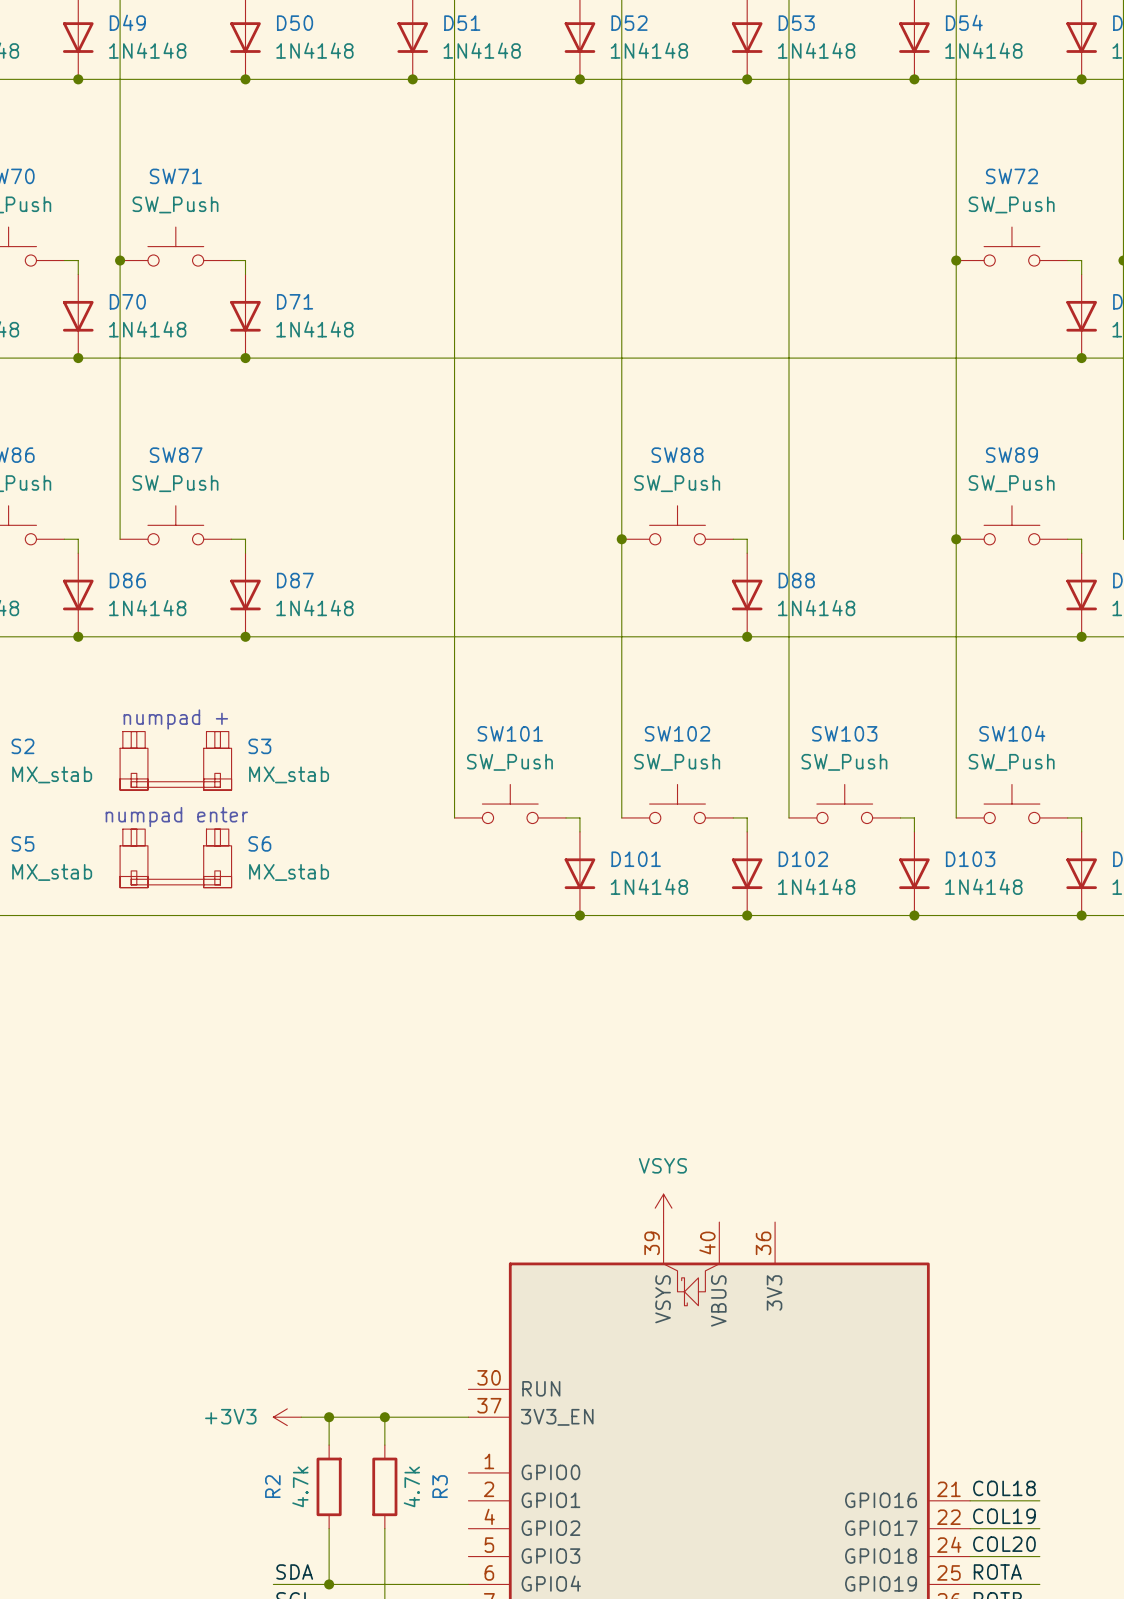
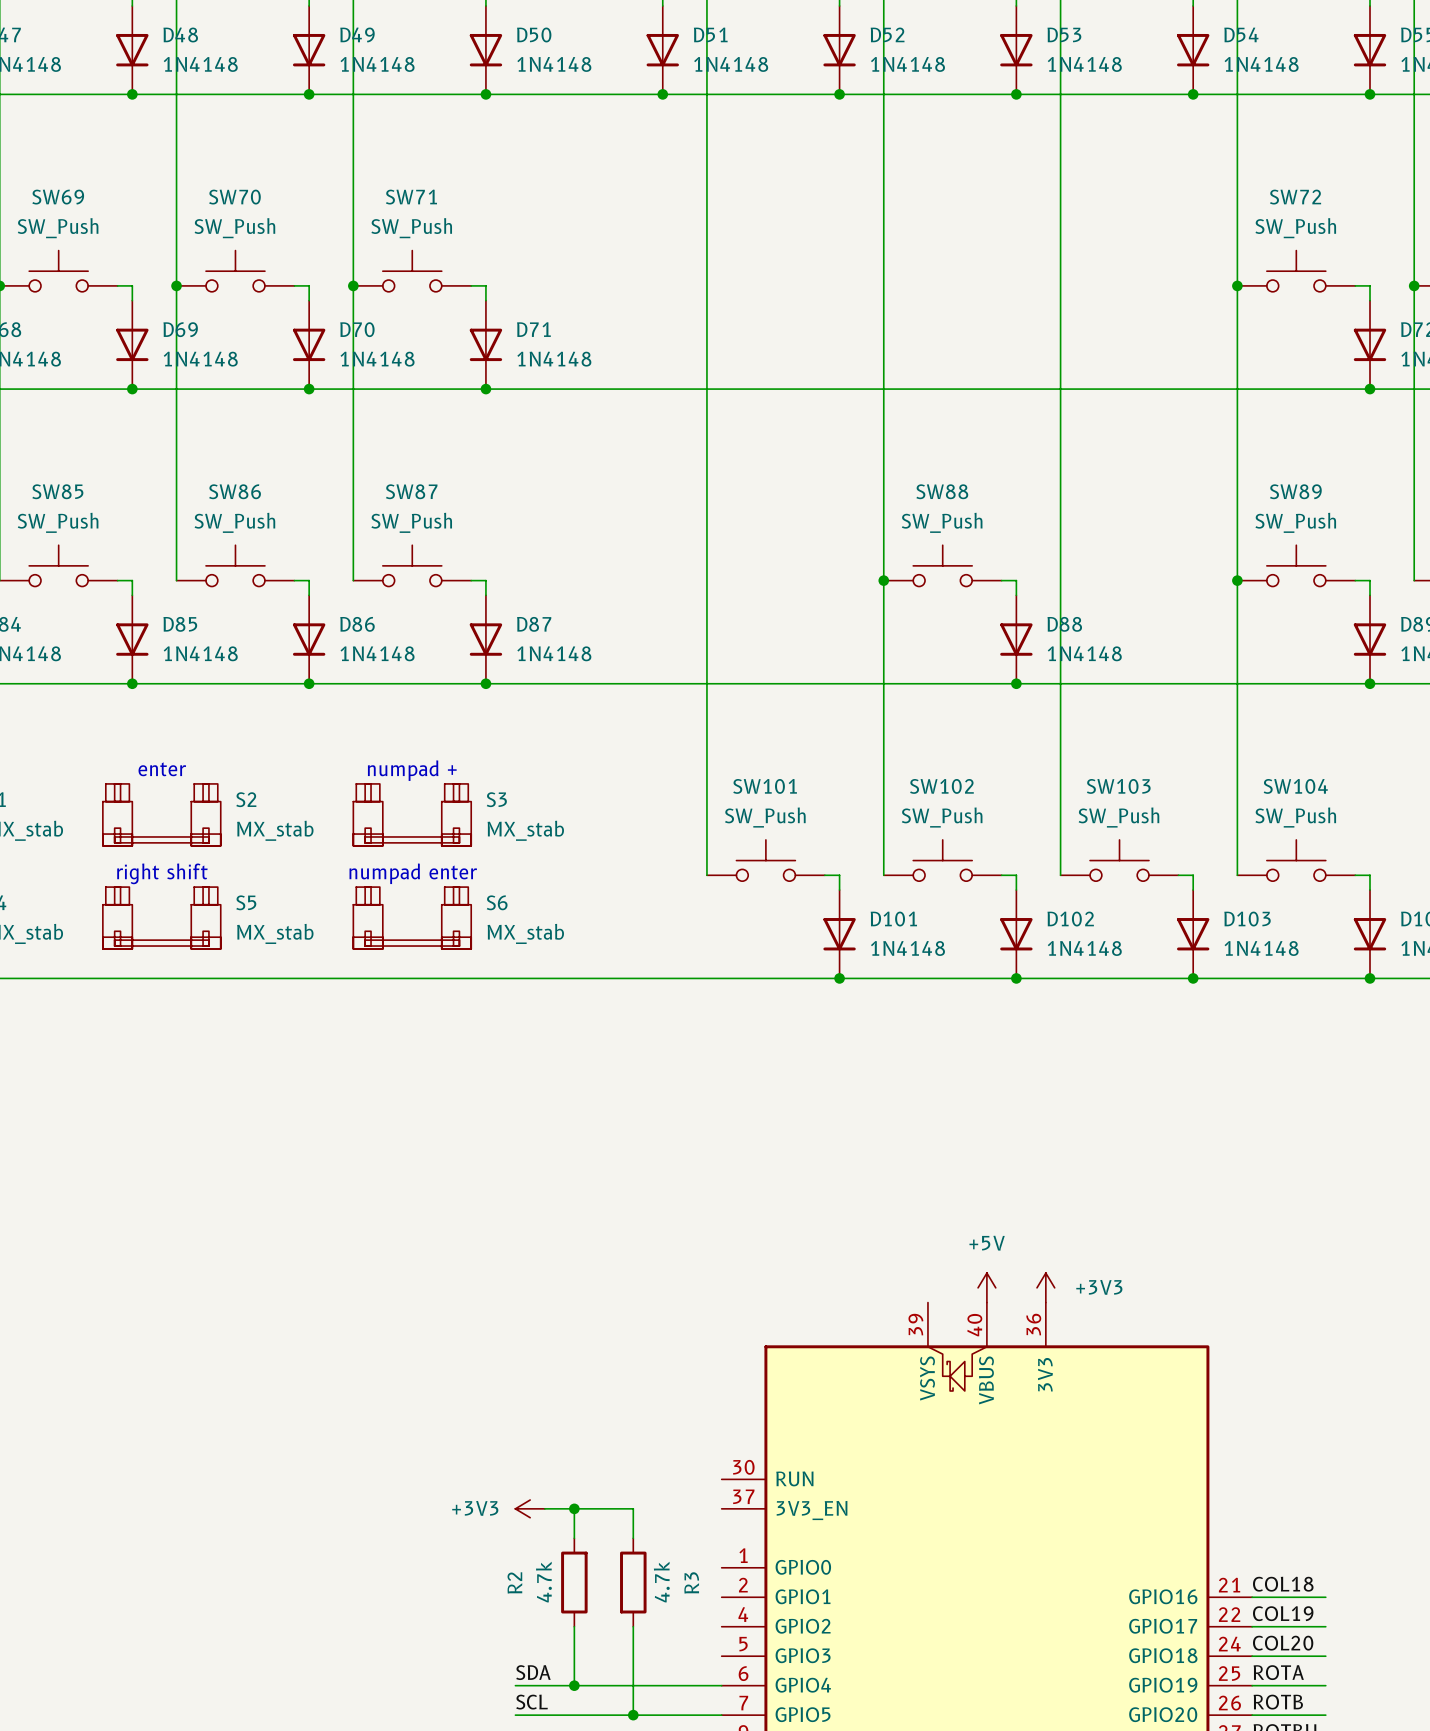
power symbol: VSYS (663, 1208) -> none
power symbol: none -> +5V (986, 1287)
power symbol: none -> +3V3 (1045, 1287)
wire: (384, 1417) (468, 1417) -> none
junction: (384, 1417) -> none

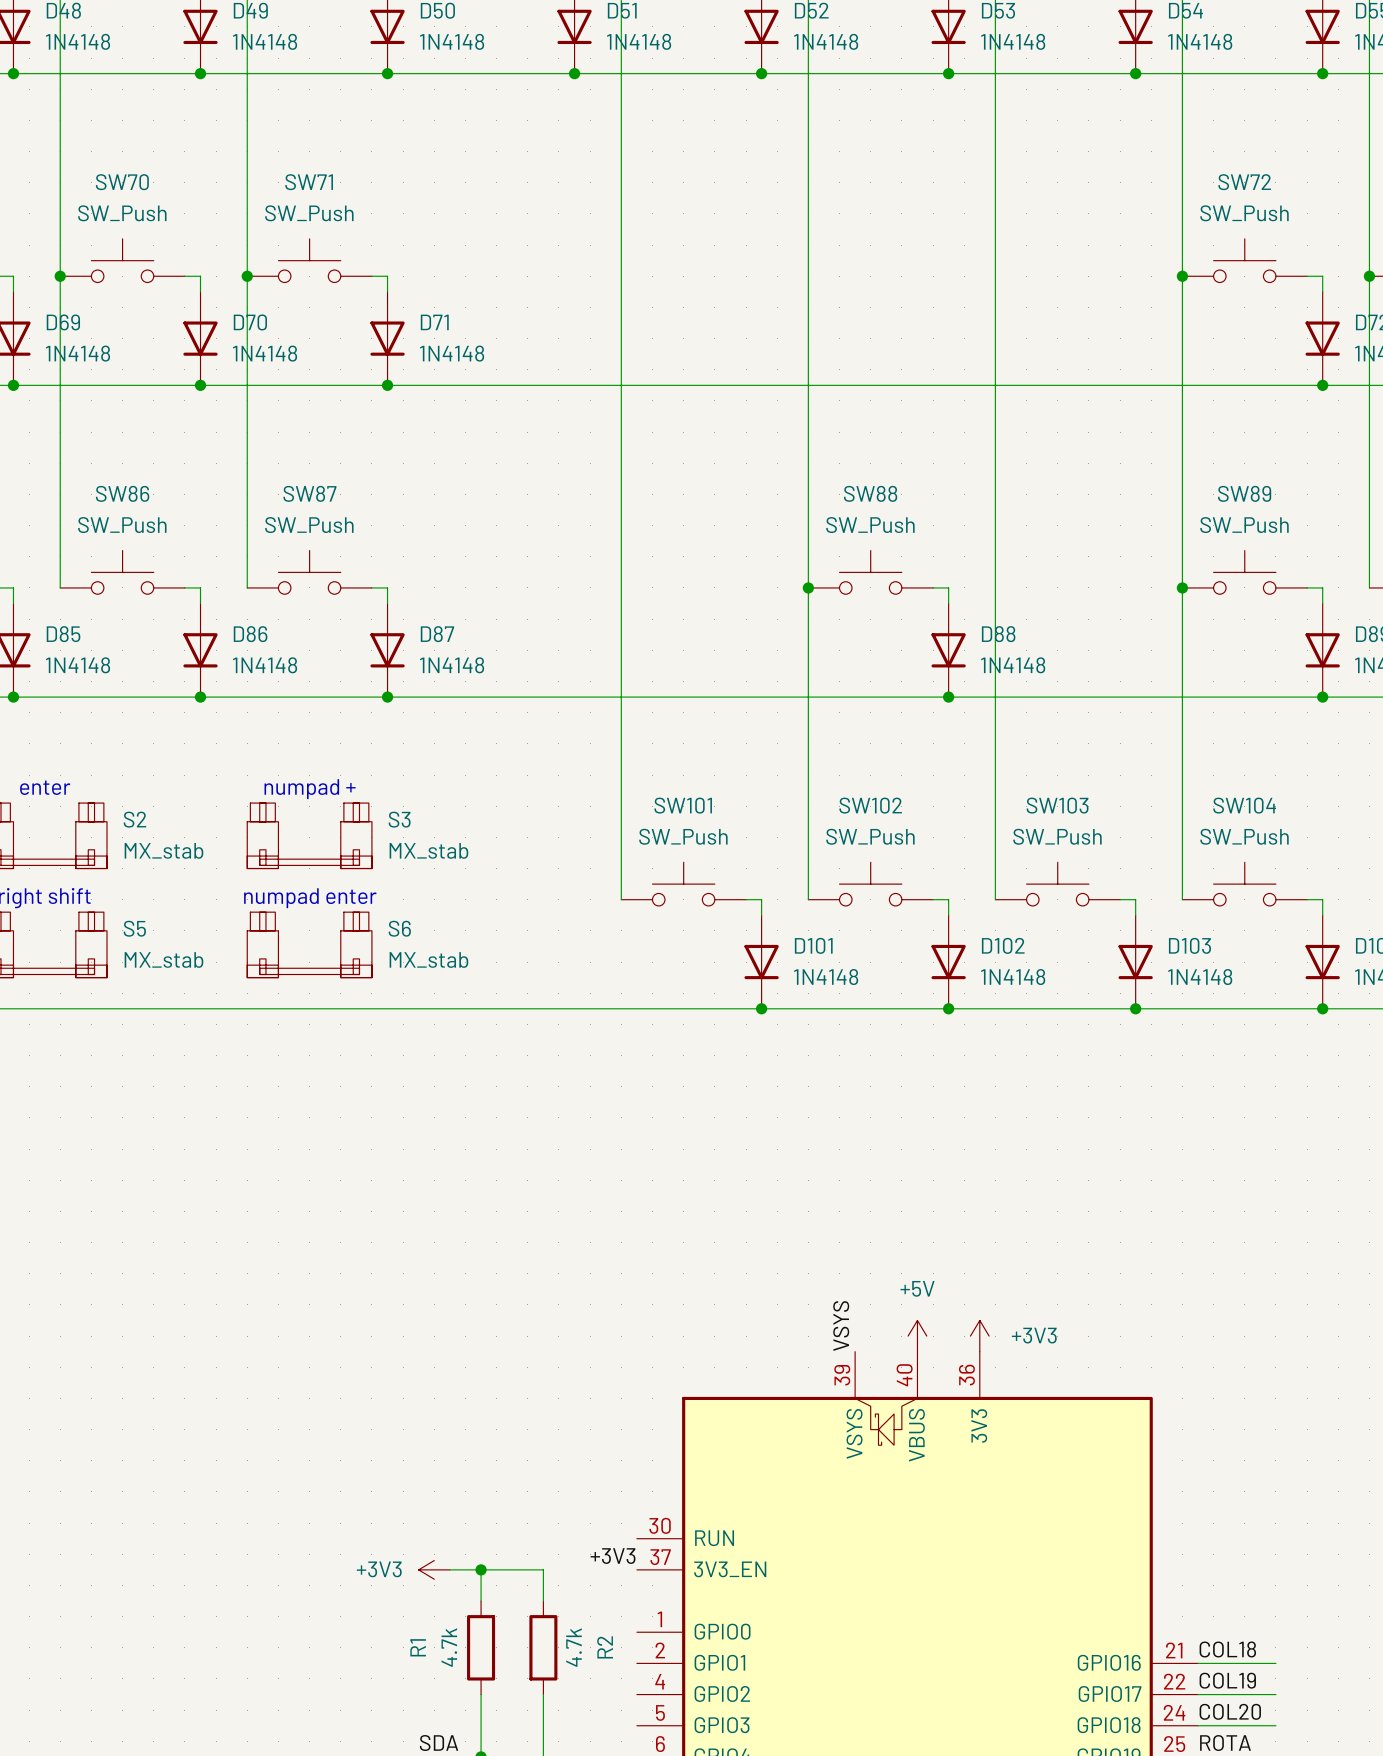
label: none -> VSYS (841, 1326)
label: none -> +3V3 (613, 1556)
R2 name: R2 (514, 1582) -> R1 (418, 1647)
R3 name: R3 (691, 1582) -> R2 (605, 1647)

